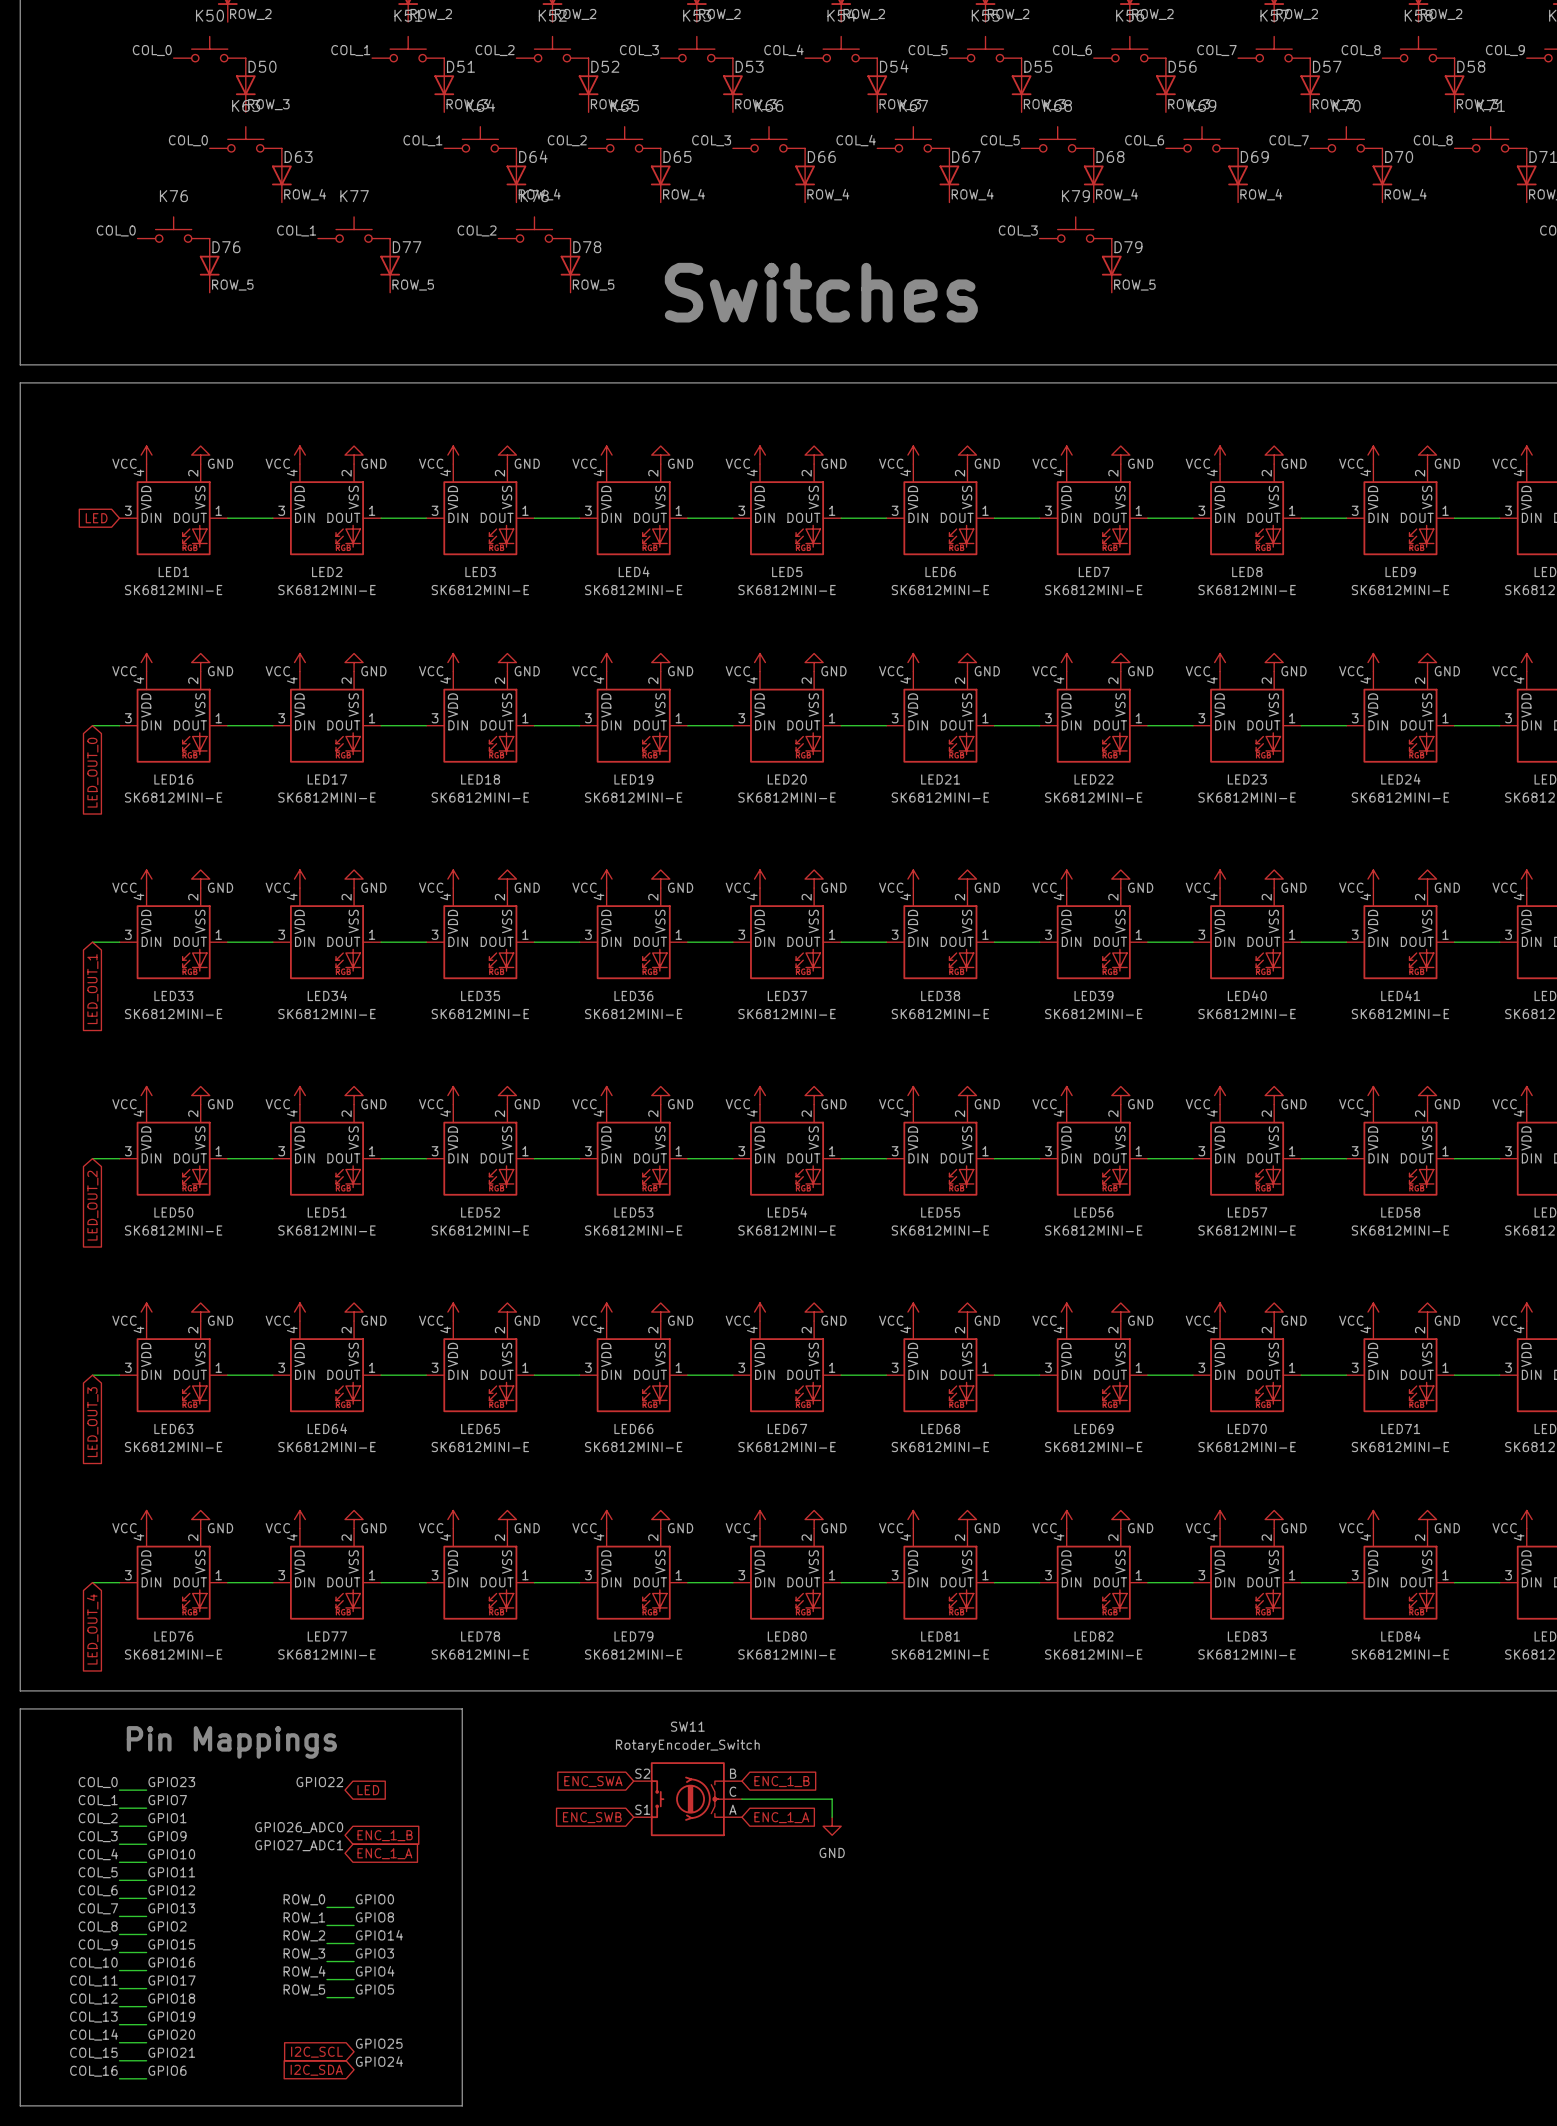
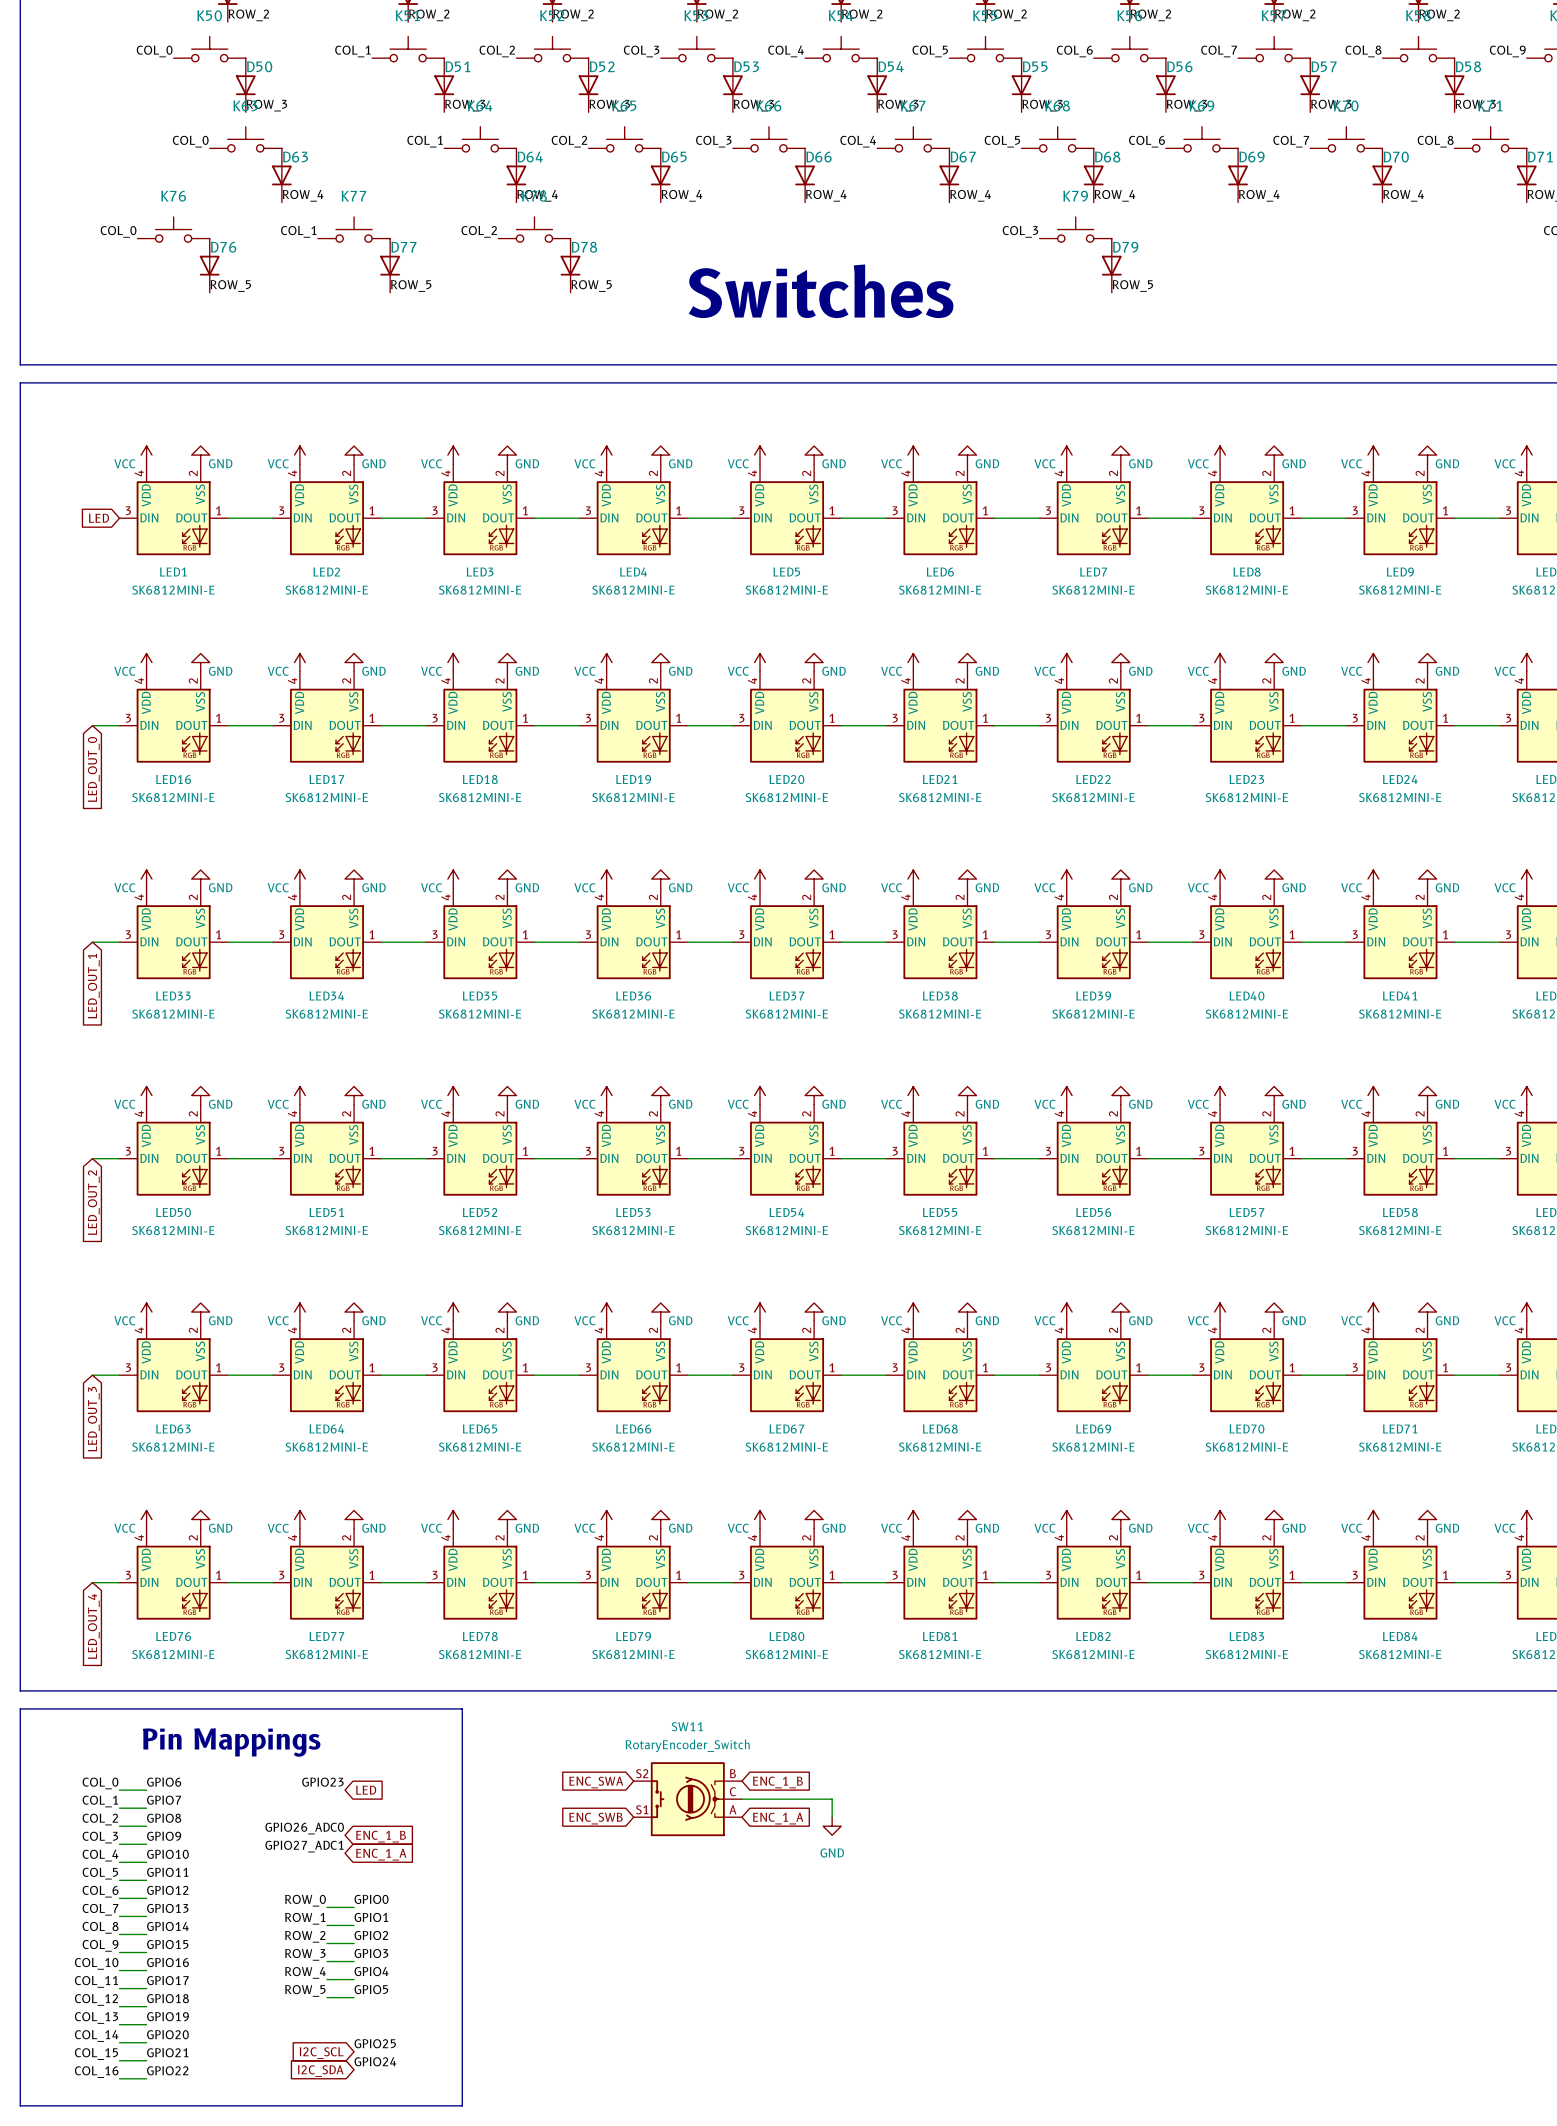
label: GPIO23 (171, 1782) -> GPIO6 (164, 1782)
label: GPIO22 (319, 1782) -> GPIO23 (322, 1782)
label: GPIO1 (167, 1818) -> GPIO8 (164, 1818)
label: GPIO8 (374, 1917) -> GPIO1 (371, 1917)
label: GPIO2 (167, 1926) -> GPIO14 (167, 1926)
label: GPIO14 (379, 1935) -> GPIO2 (371, 1935)
label: GPIO6 (167, 2070) -> GPIO22 (167, 2070)

